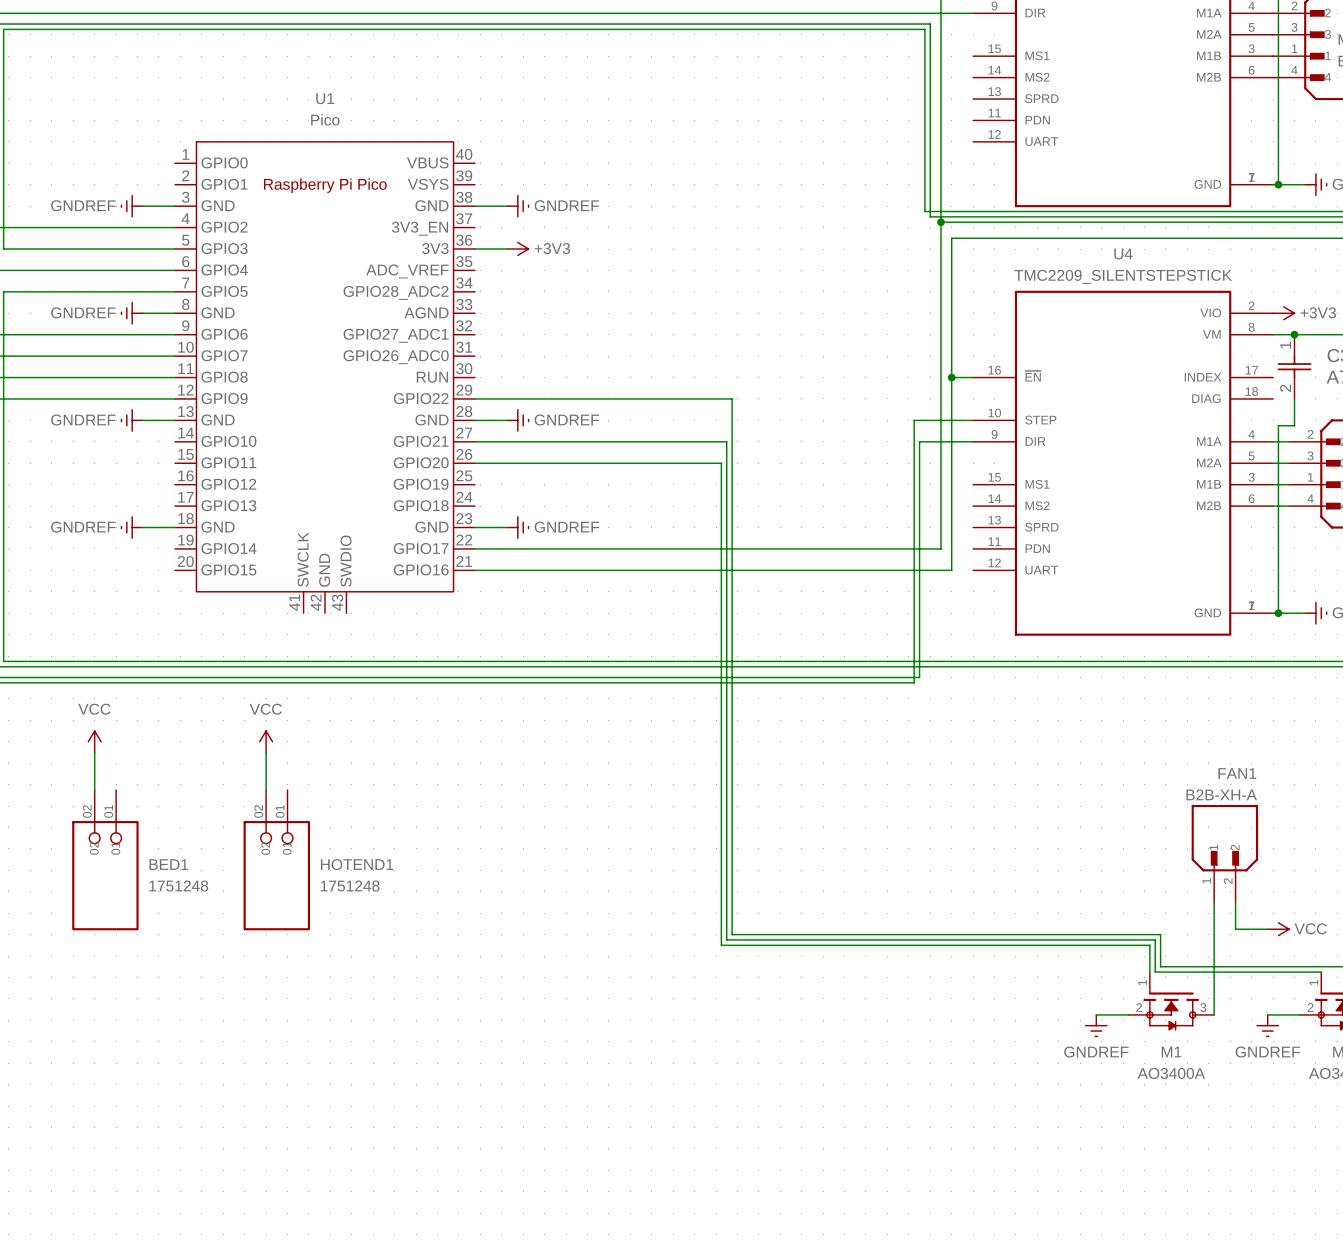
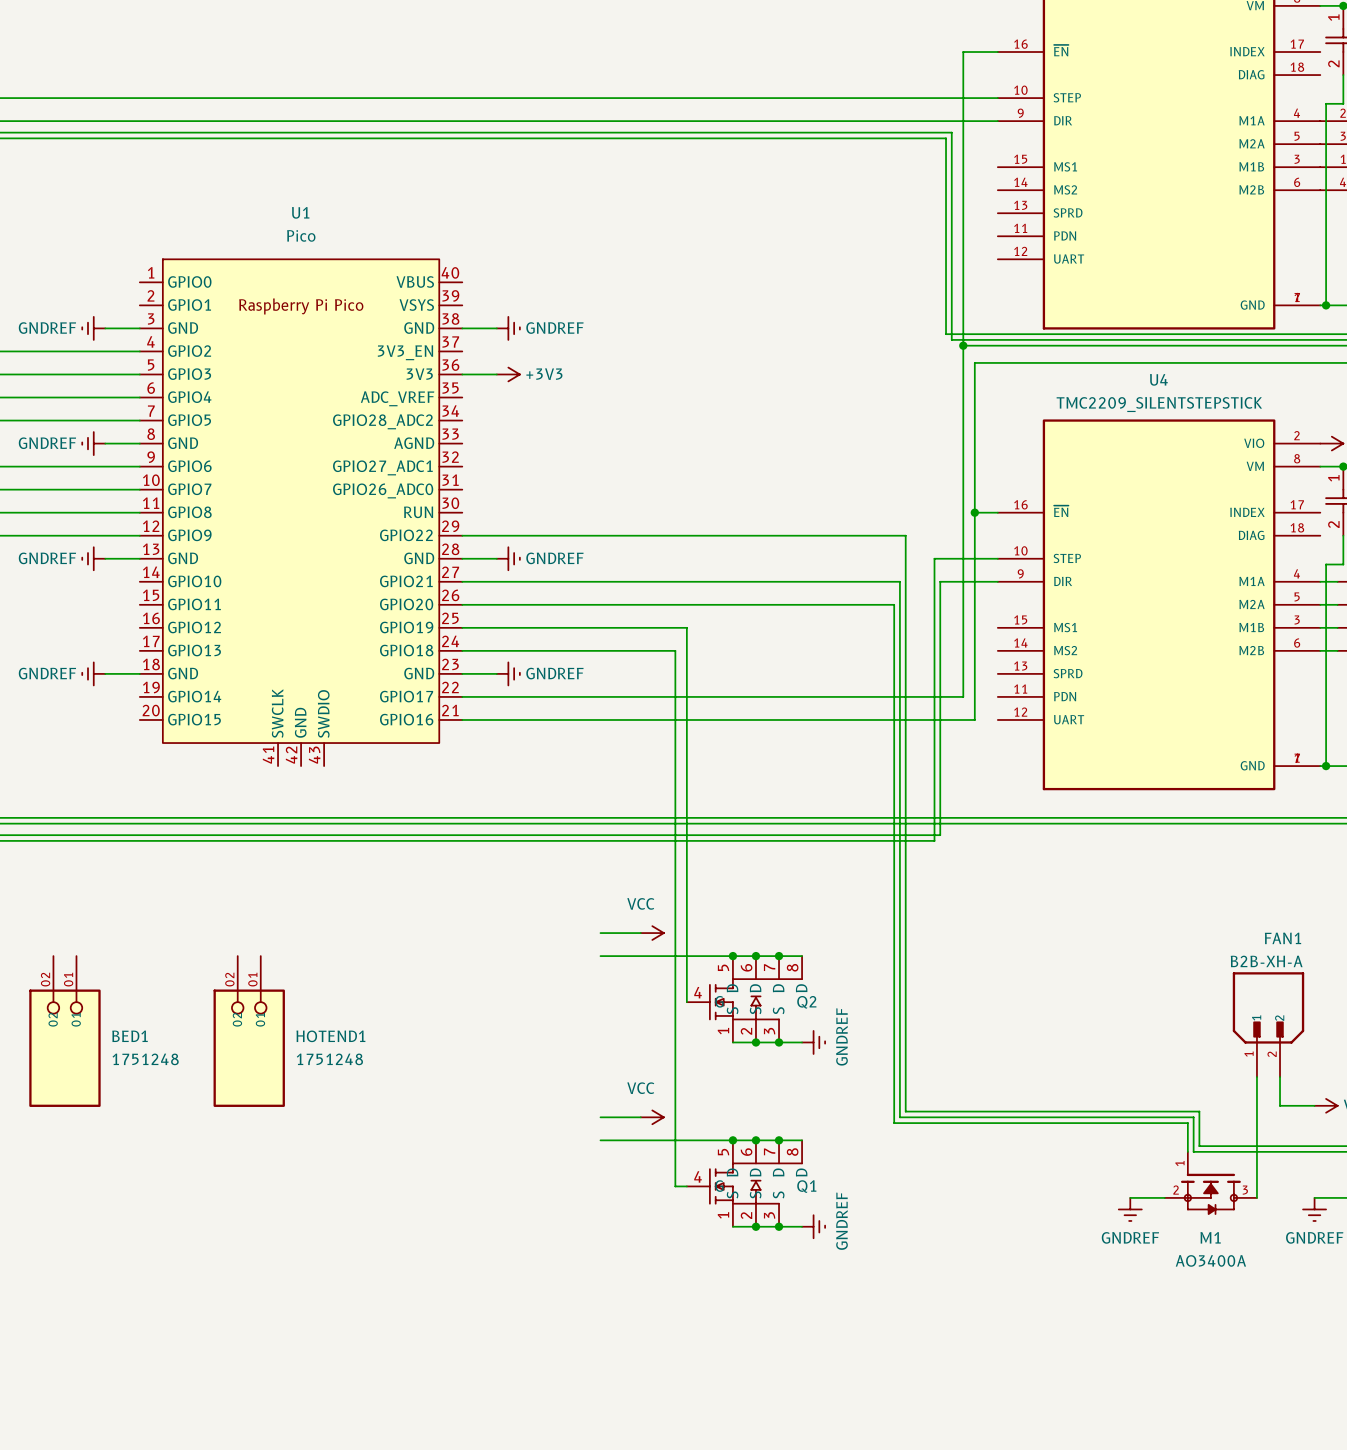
wire: (732, 398) (732, 934) (887, 934) -> (738, 535) (905, 535) (905, 1111)
wire: (726, 441) (726, 939) (882, 939) -> (732, 581) (899, 581) (899, 1117)
wire: (721, 463) (721, 945) (876, 945) -> (727, 604) (894, 604) (894, 1123)
wire: none -> (462, 627) (686, 627) (686, 1002)
wire: none -> (462, 650) (675, 650) (675, 1186) (686, 1186)
power symbol: VCC (94, 741) -> none
power symbol: VCC (266, 741) -> none
wire: (94, 752) (94, 789) -> none
wire: (266, 752) (266, 789) -> none
wire: none -> (600, 933) (640, 933)
power symbol: none -> VCC (652, 933)
wire: none -> (600, 956) (802, 956)
junction: none -> (732, 956)
junction: none -> (755, 956)
junction: none -> (779, 956)
Q2: none -> (744, 999)
wire: none -> (732, 1042) (802, 1042)
junction: none -> (755, 1042)
junction: none -> (779, 1042)
power symbol: none -> GNDREF (813, 1042)
wire: none -> (600, 1117) (640, 1117)
power symbol: none -> VCC (652, 1117)
wire: none -> (600, 1140) (802, 1140)
junction: none -> (732, 1140)
junction: none -> (755, 1140)
junction: none -> (779, 1140)
Q1: none -> (744, 1183)
wire: none -> (732, 1226) (802, 1226)
junction: none -> (755, 1226)
junction: none -> (779, 1226)
power symbol: none -> GNDREF (813, 1226)

